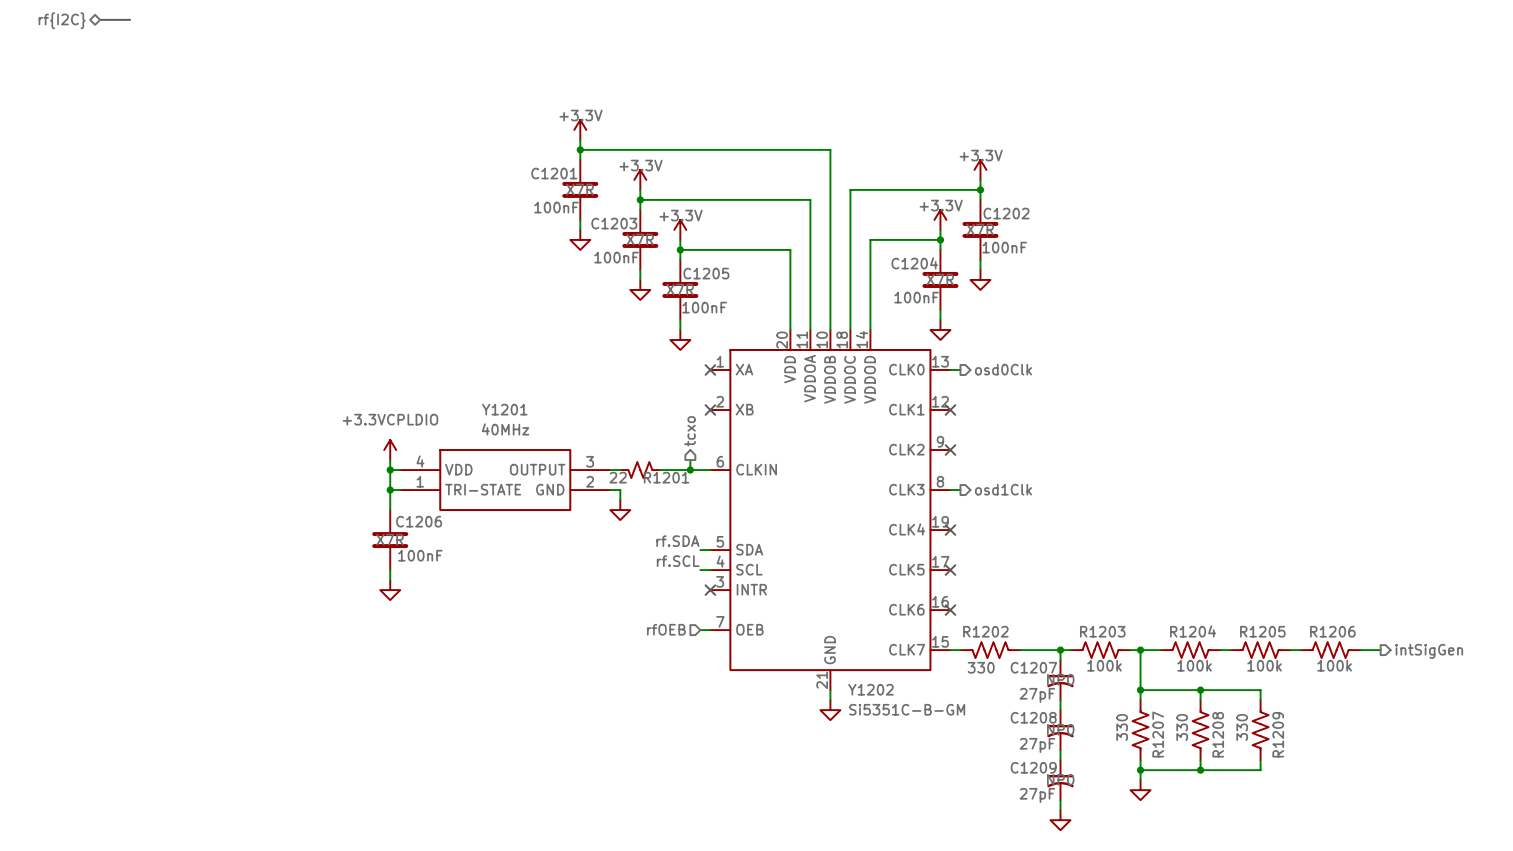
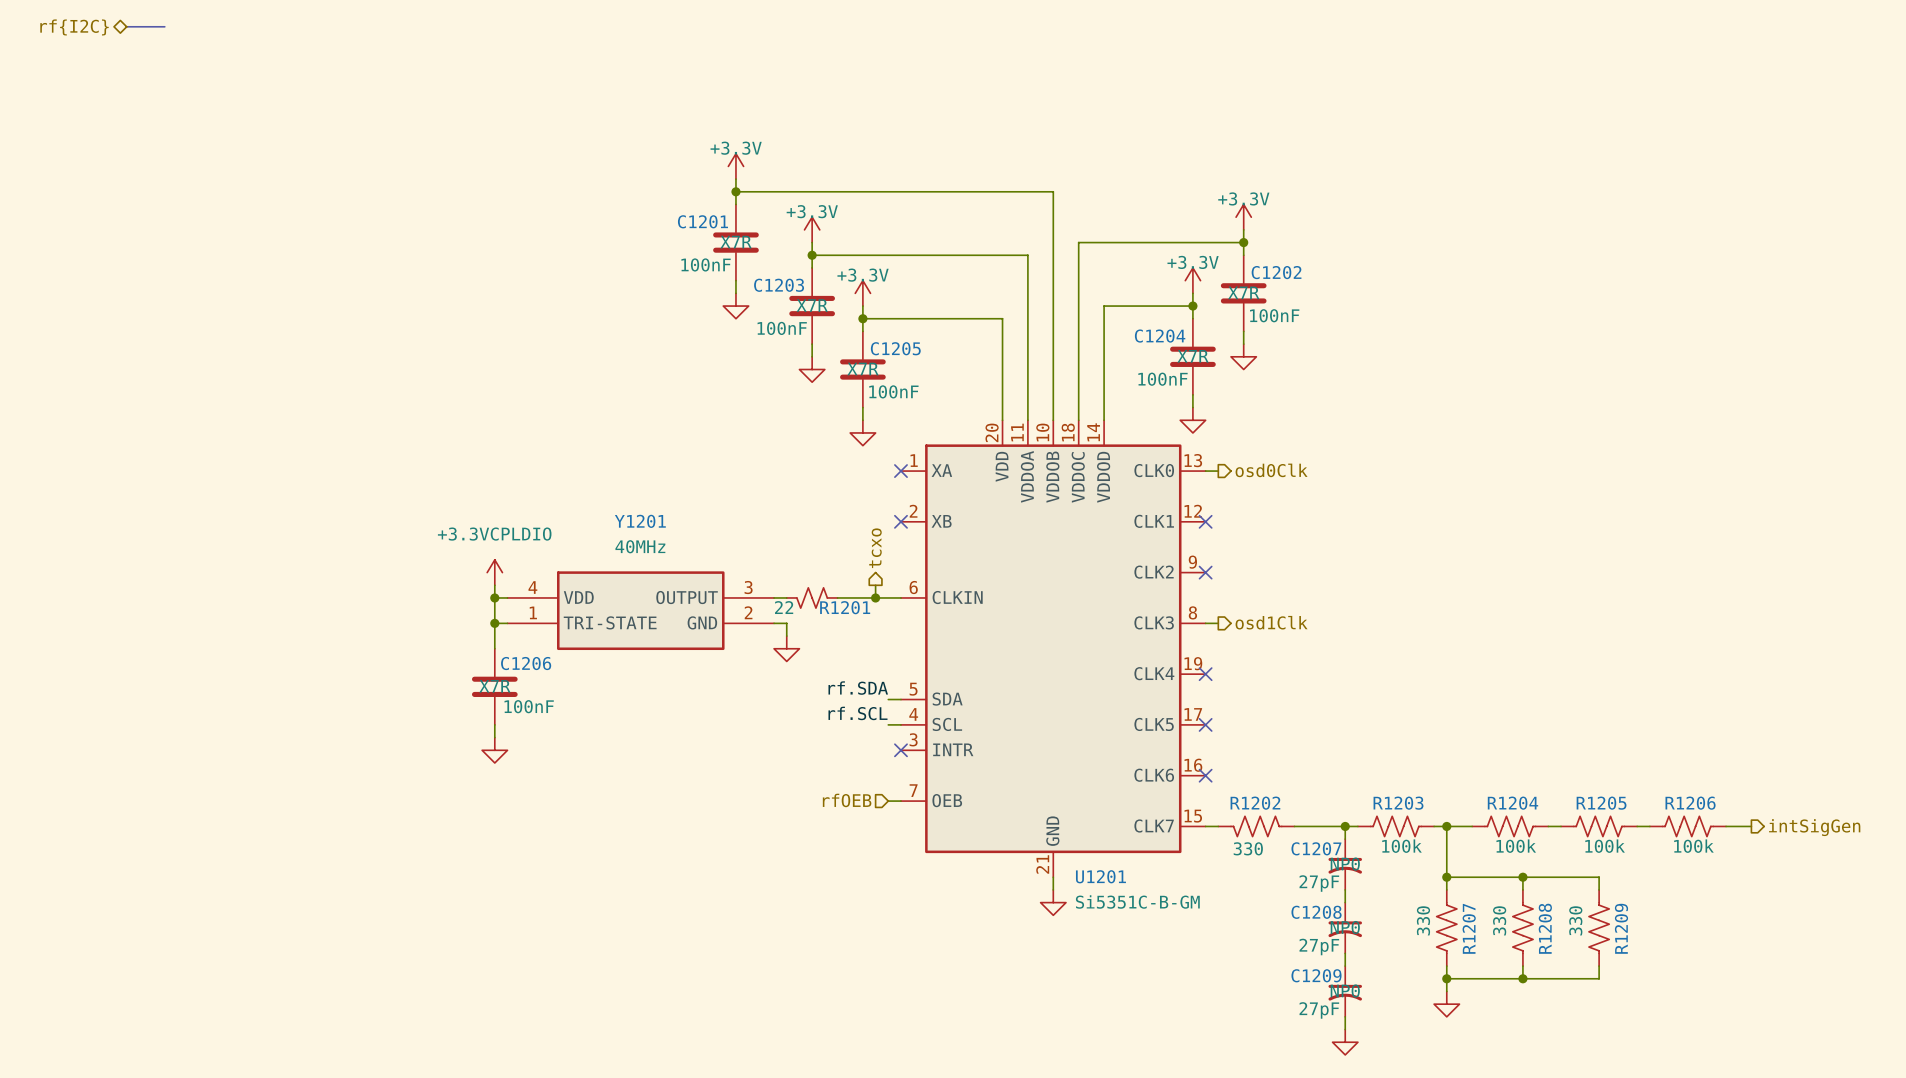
Y1202 name: Y1202 (870, 689) -> U1201 (1100, 876)

